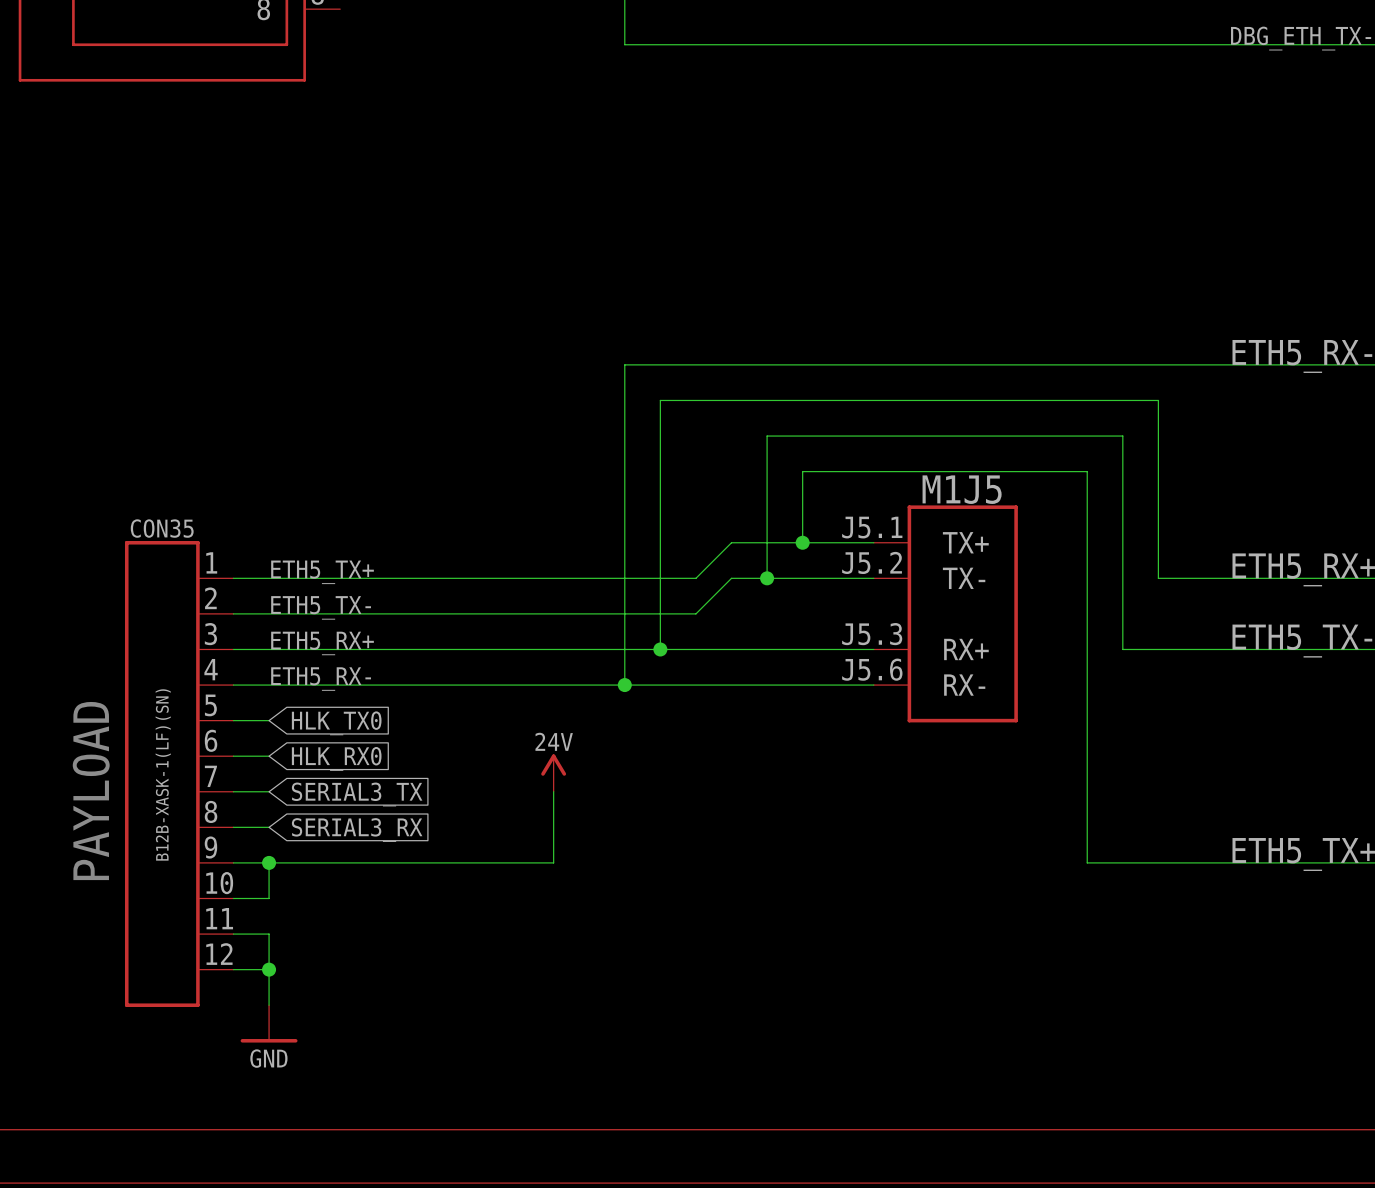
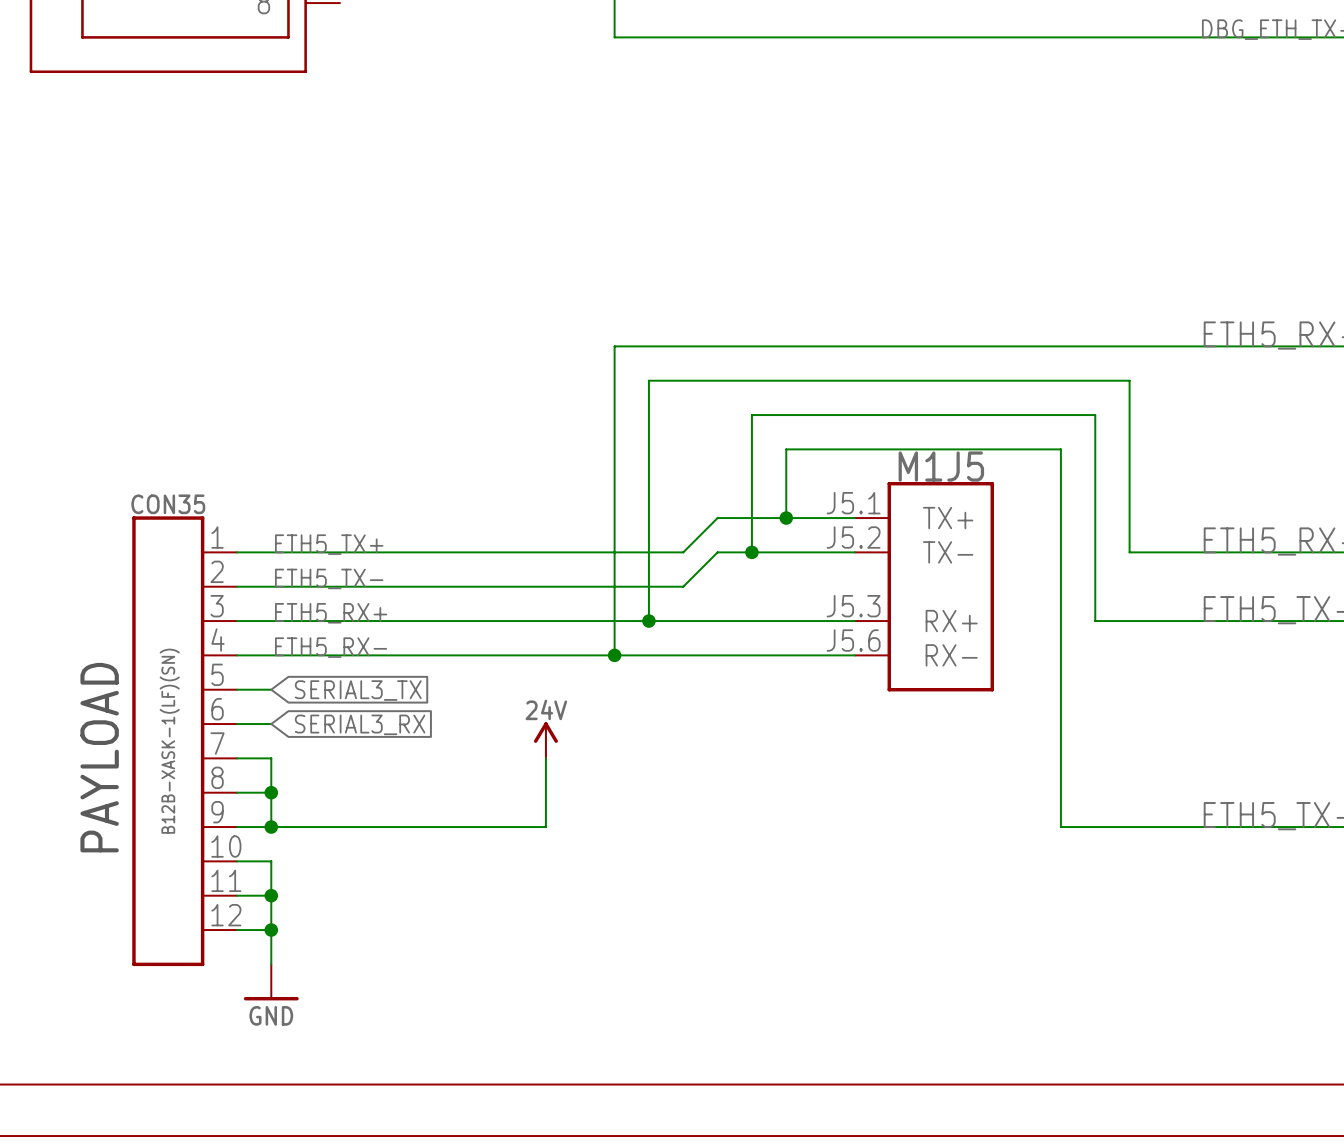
global label: HLK_TX0 (336, 723) -> SERIAL3_TX (358, 690)
global label: HLK_RX0 (336, 758) -> SERIAL3_RX (360, 724)
wire: none -> (271, 758) (271, 827)
global label: SERIAL3_TX (357, 794) -> none
junction: none -> (271, 792)
global label: SERIAL3_RX (357, 830) -> none
wire: (269, 862) (269, 898) -> (271, 895) (271, 861)
junction: none -> (271, 895)

